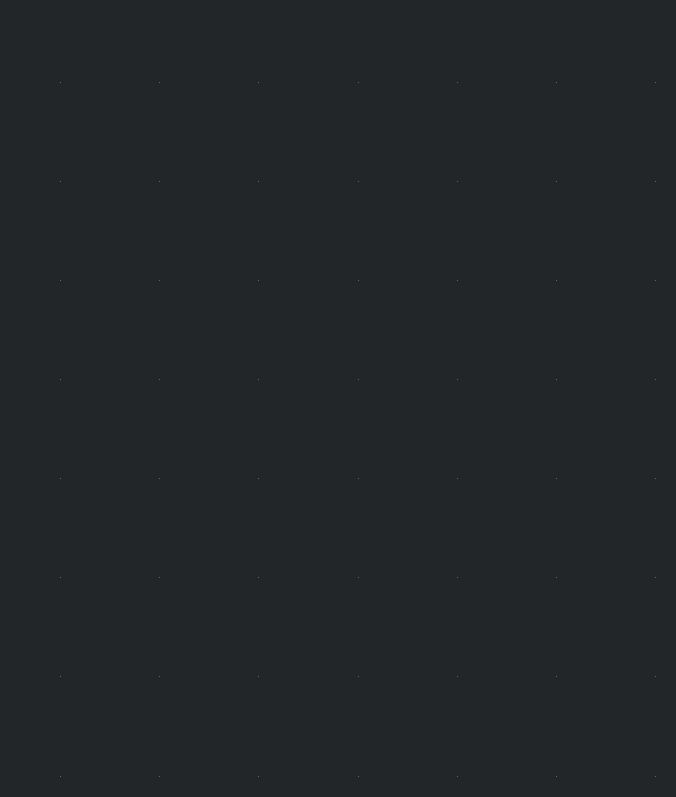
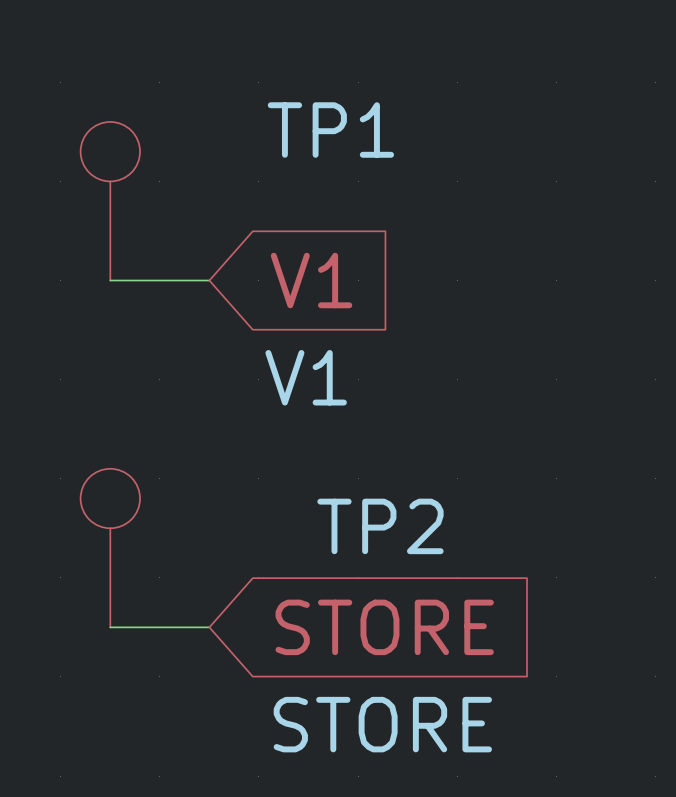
TP1: none -> V1 (110, 201)
wire: none -> (110, 280) (209, 280)
global label: none -> V1 (311, 280)
TP2: none -> STORE (110, 548)
wire: none -> (110, 627) (209, 627)
global label: none -> STORE (384, 627)

